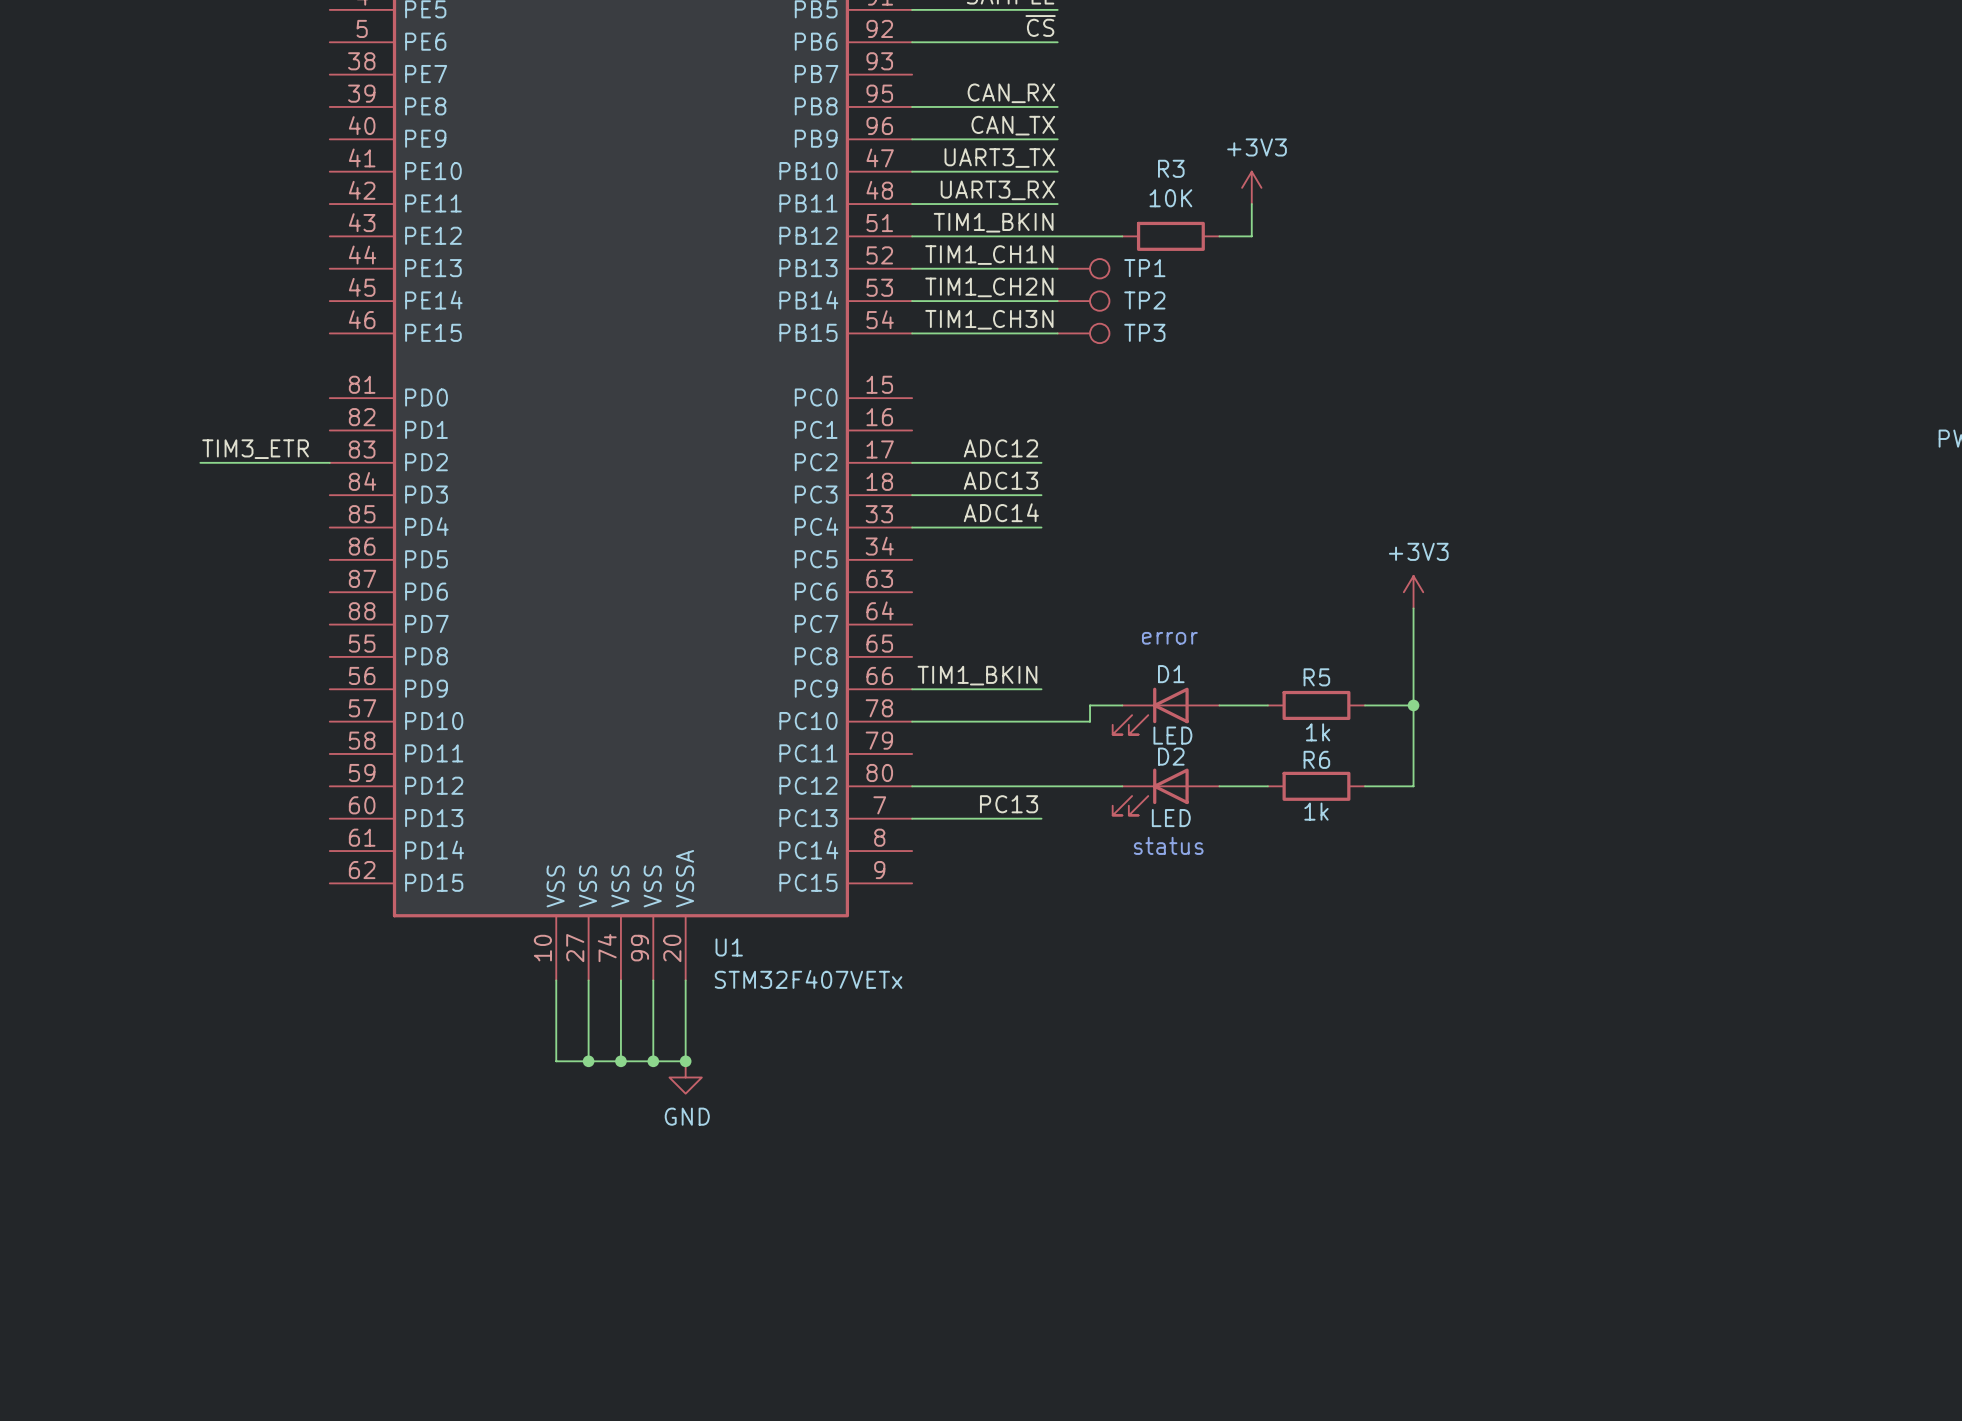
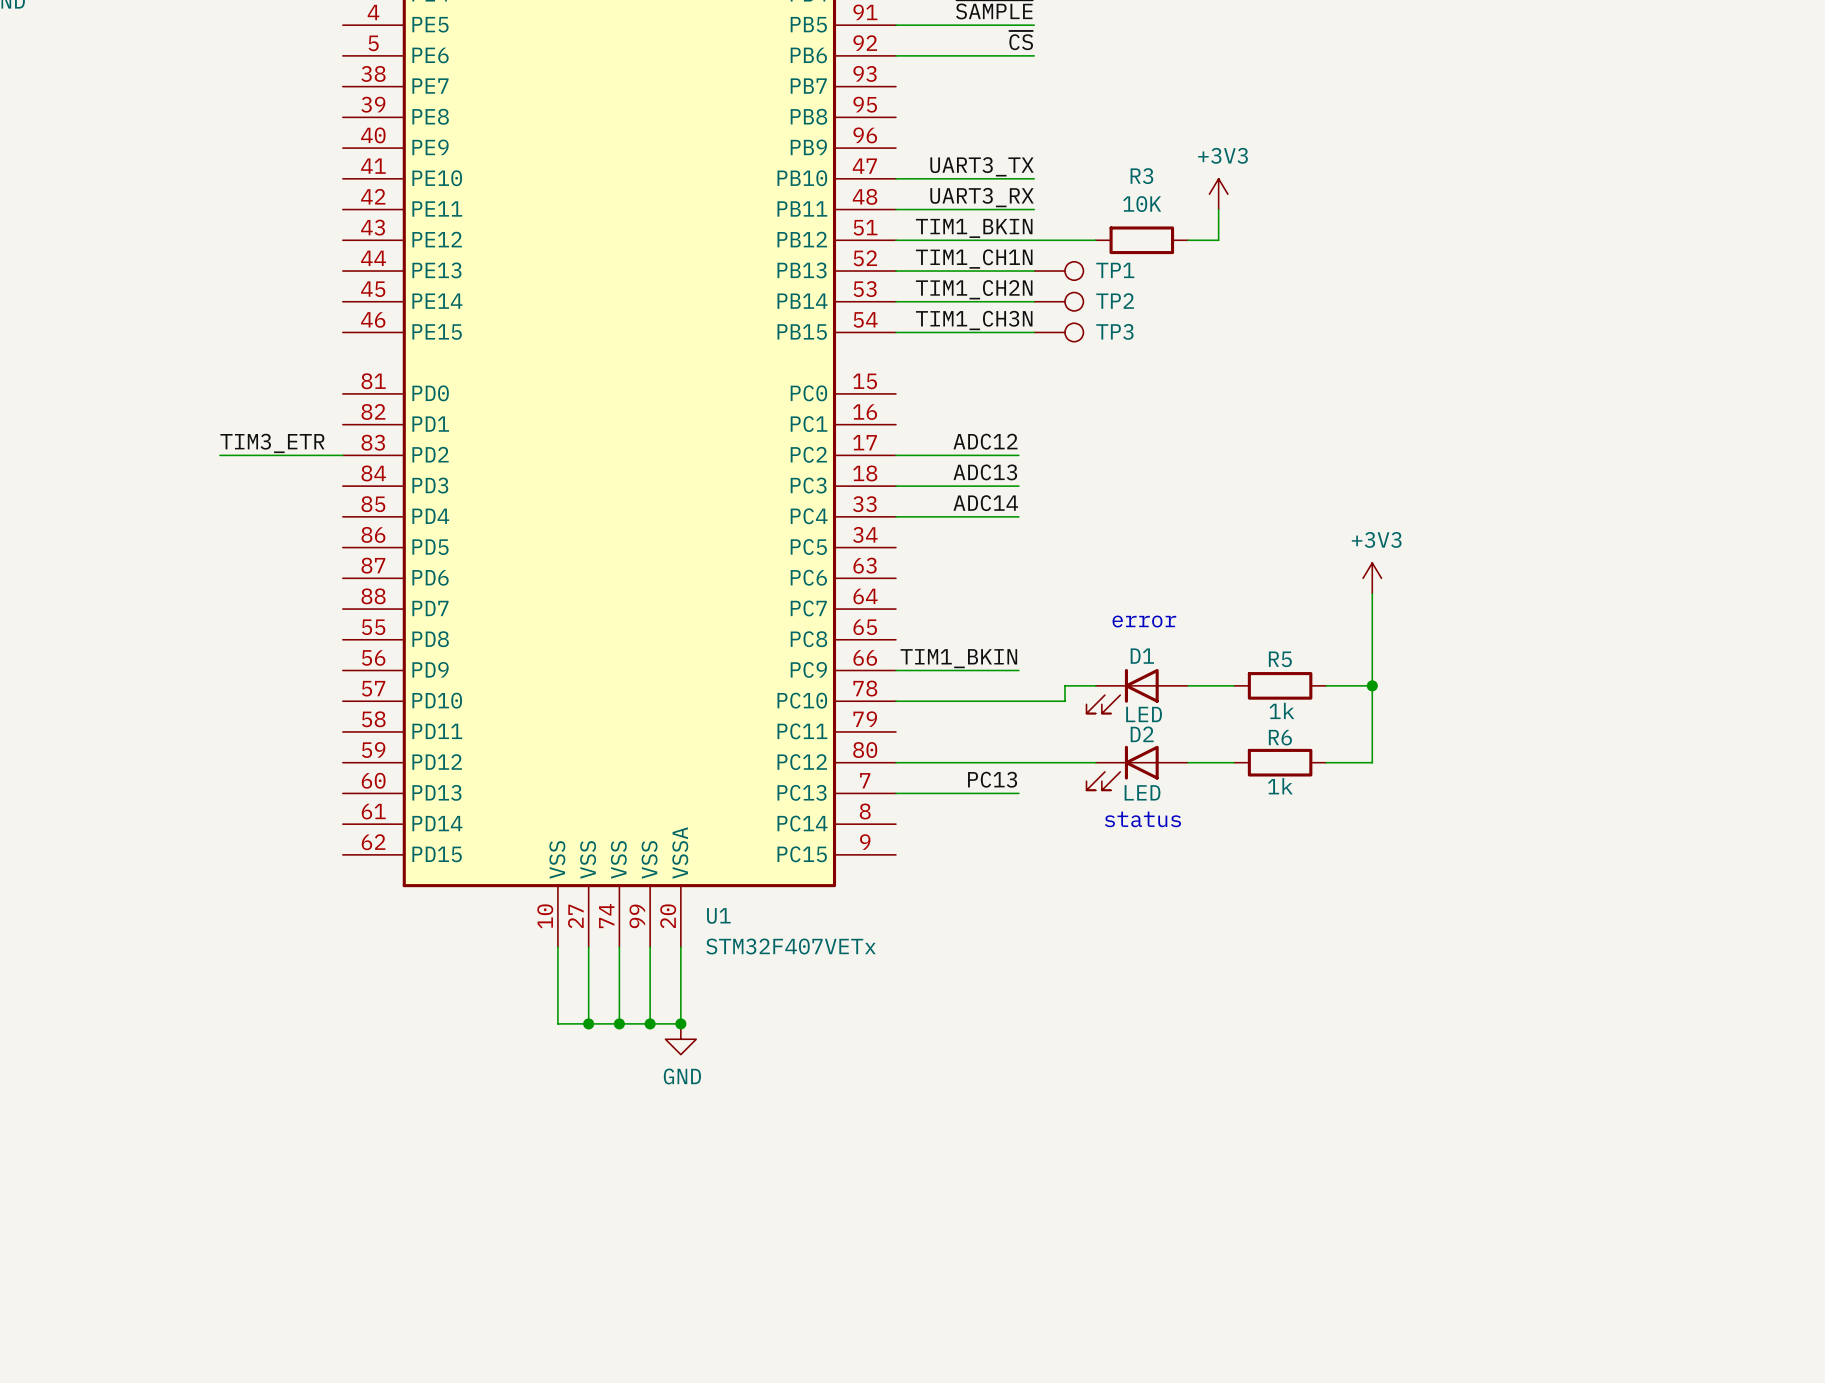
label: CAN_RX (1011, 93) -> none
wire: (912, 106) (1057, 106) -> none
label: CAN_TX (1013, 125) -> none
wire: (912, 139) (1057, 139) -> none

